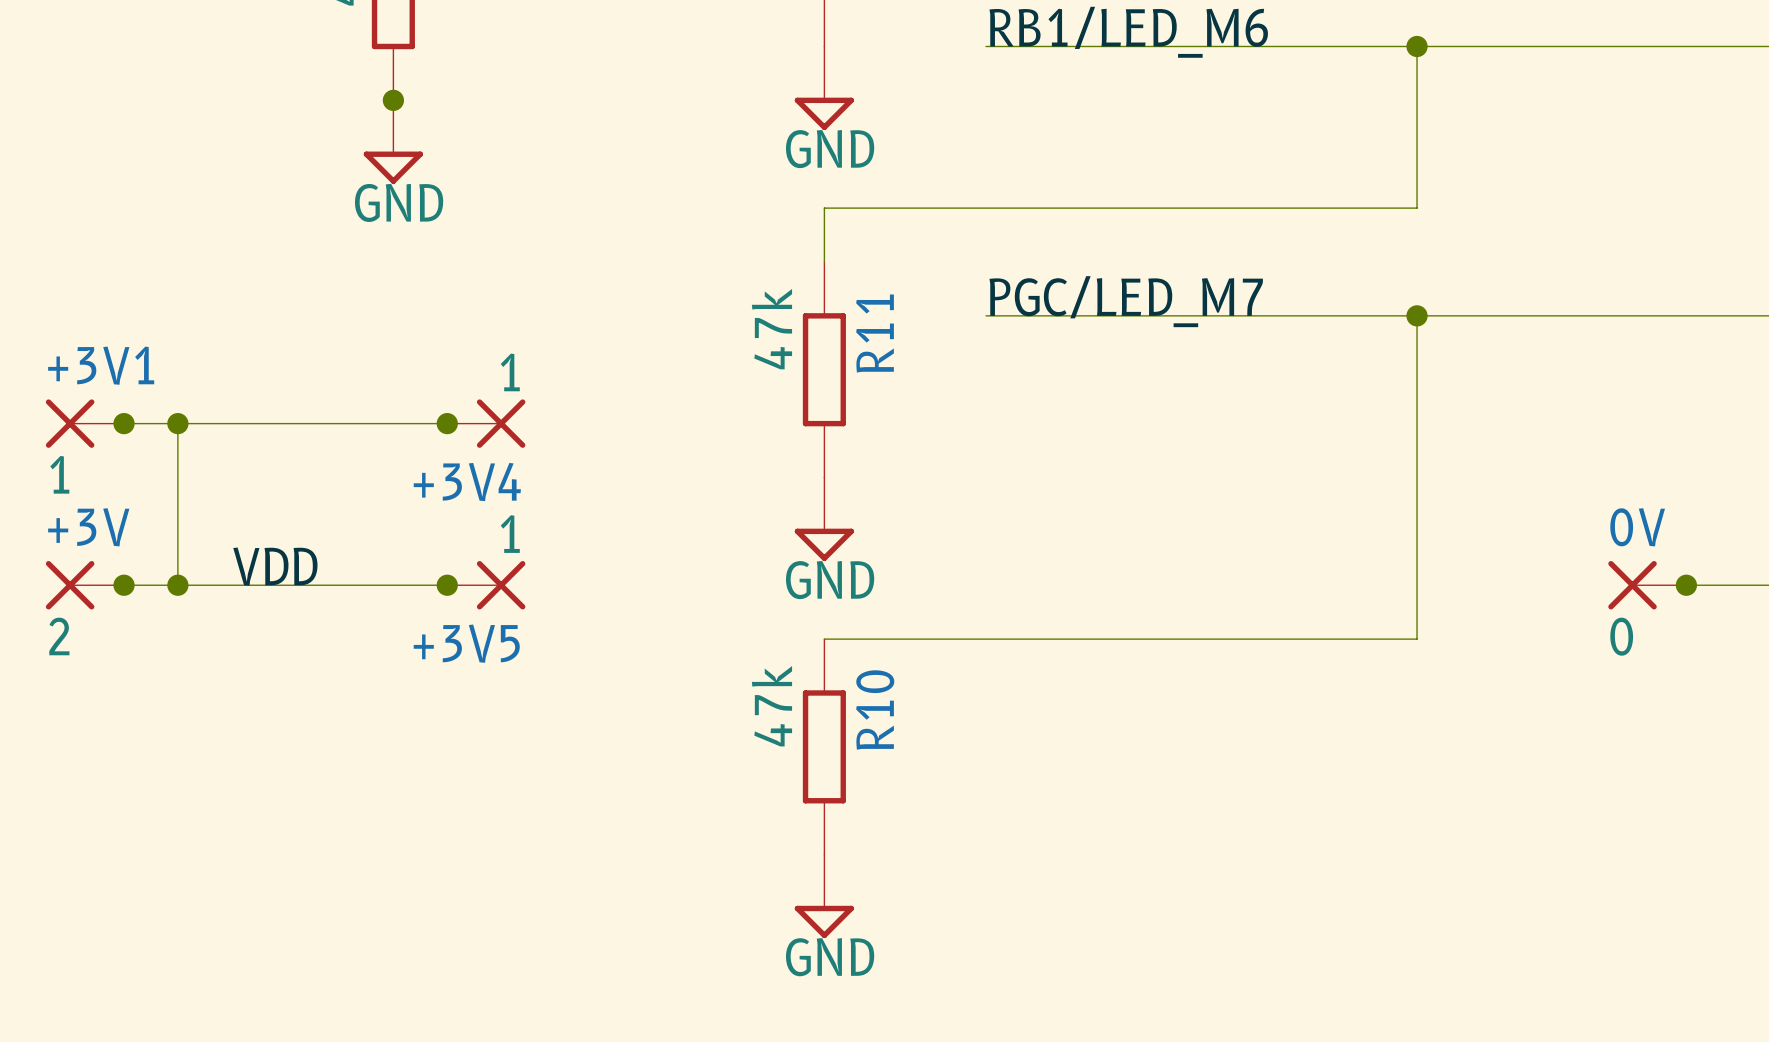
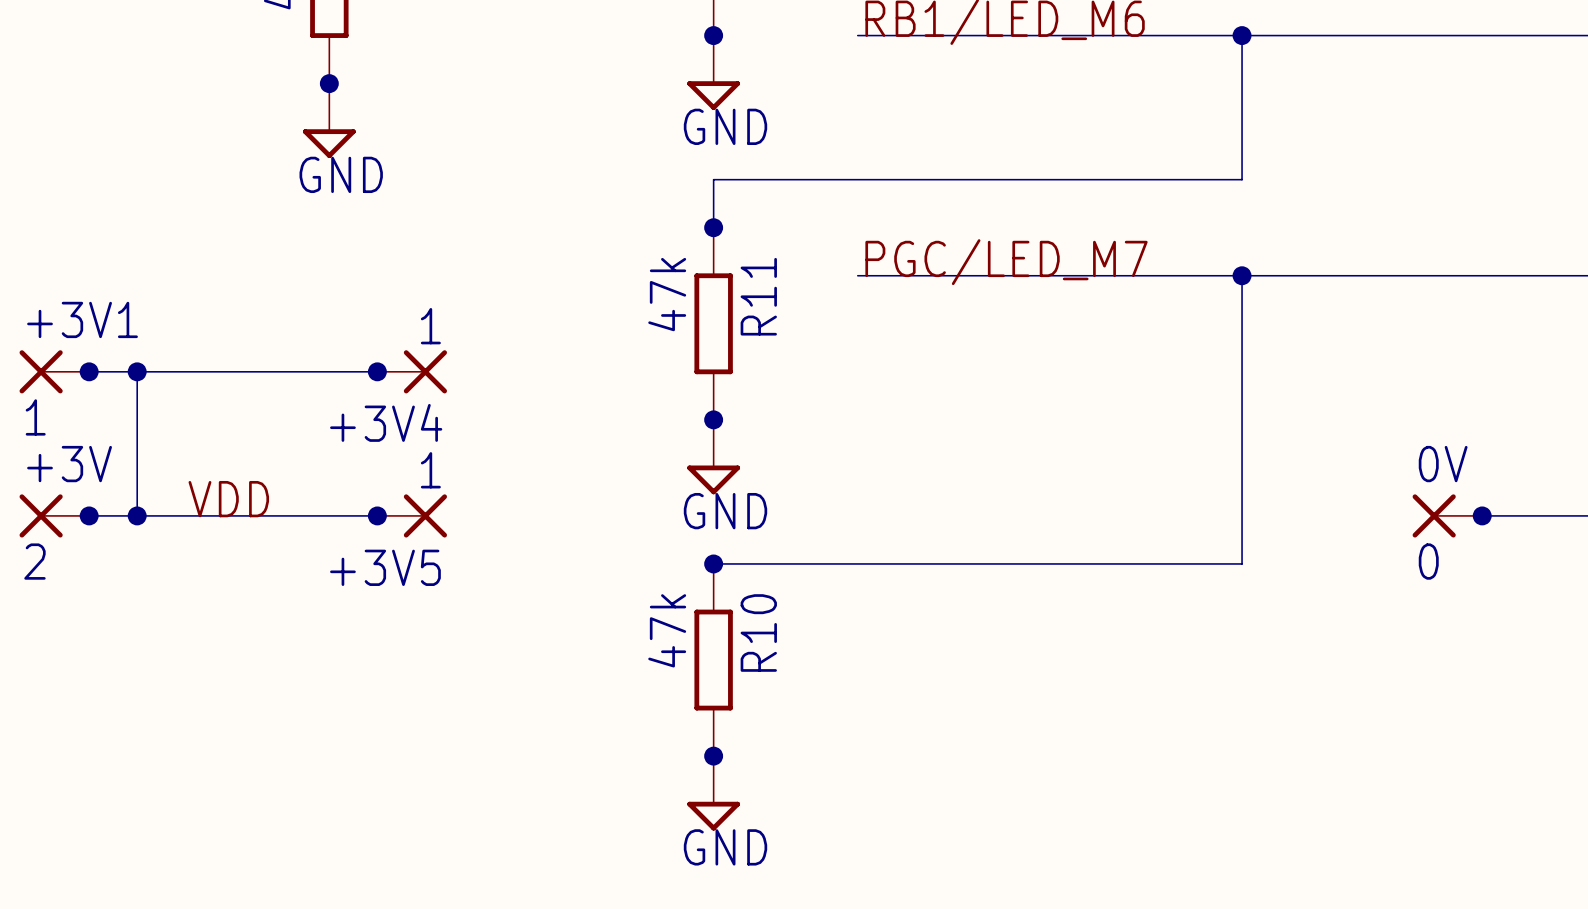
junction: none -> (713, 35)
junction: none -> (713, 227)
junction: none -> (713, 419)
junction: none -> (713, 563)
junction: none -> (713, 756)

